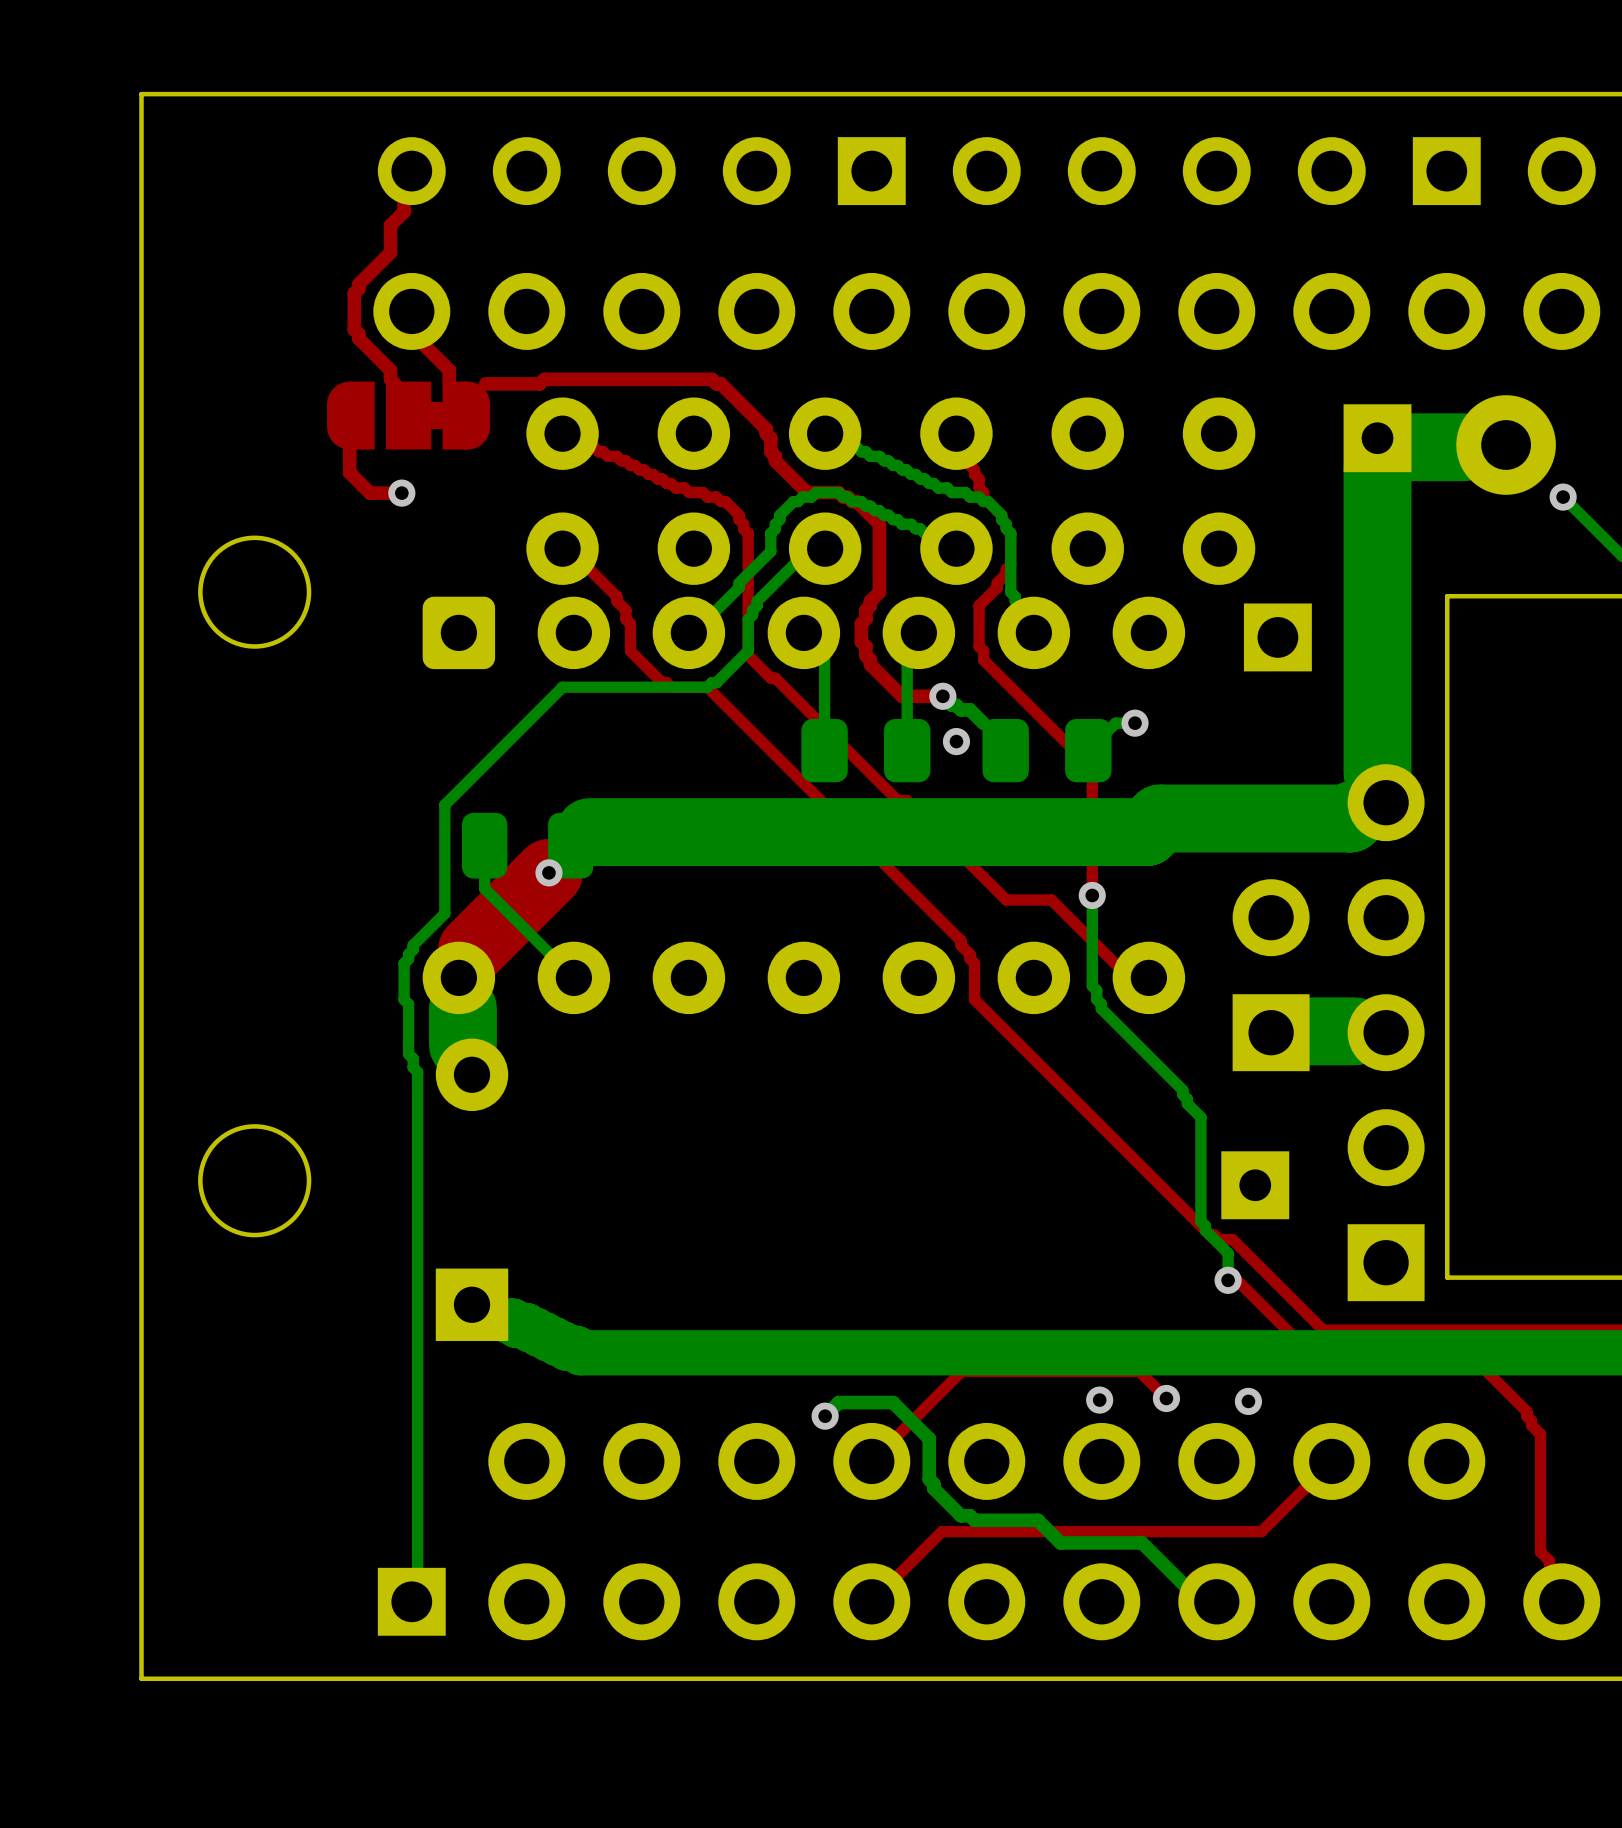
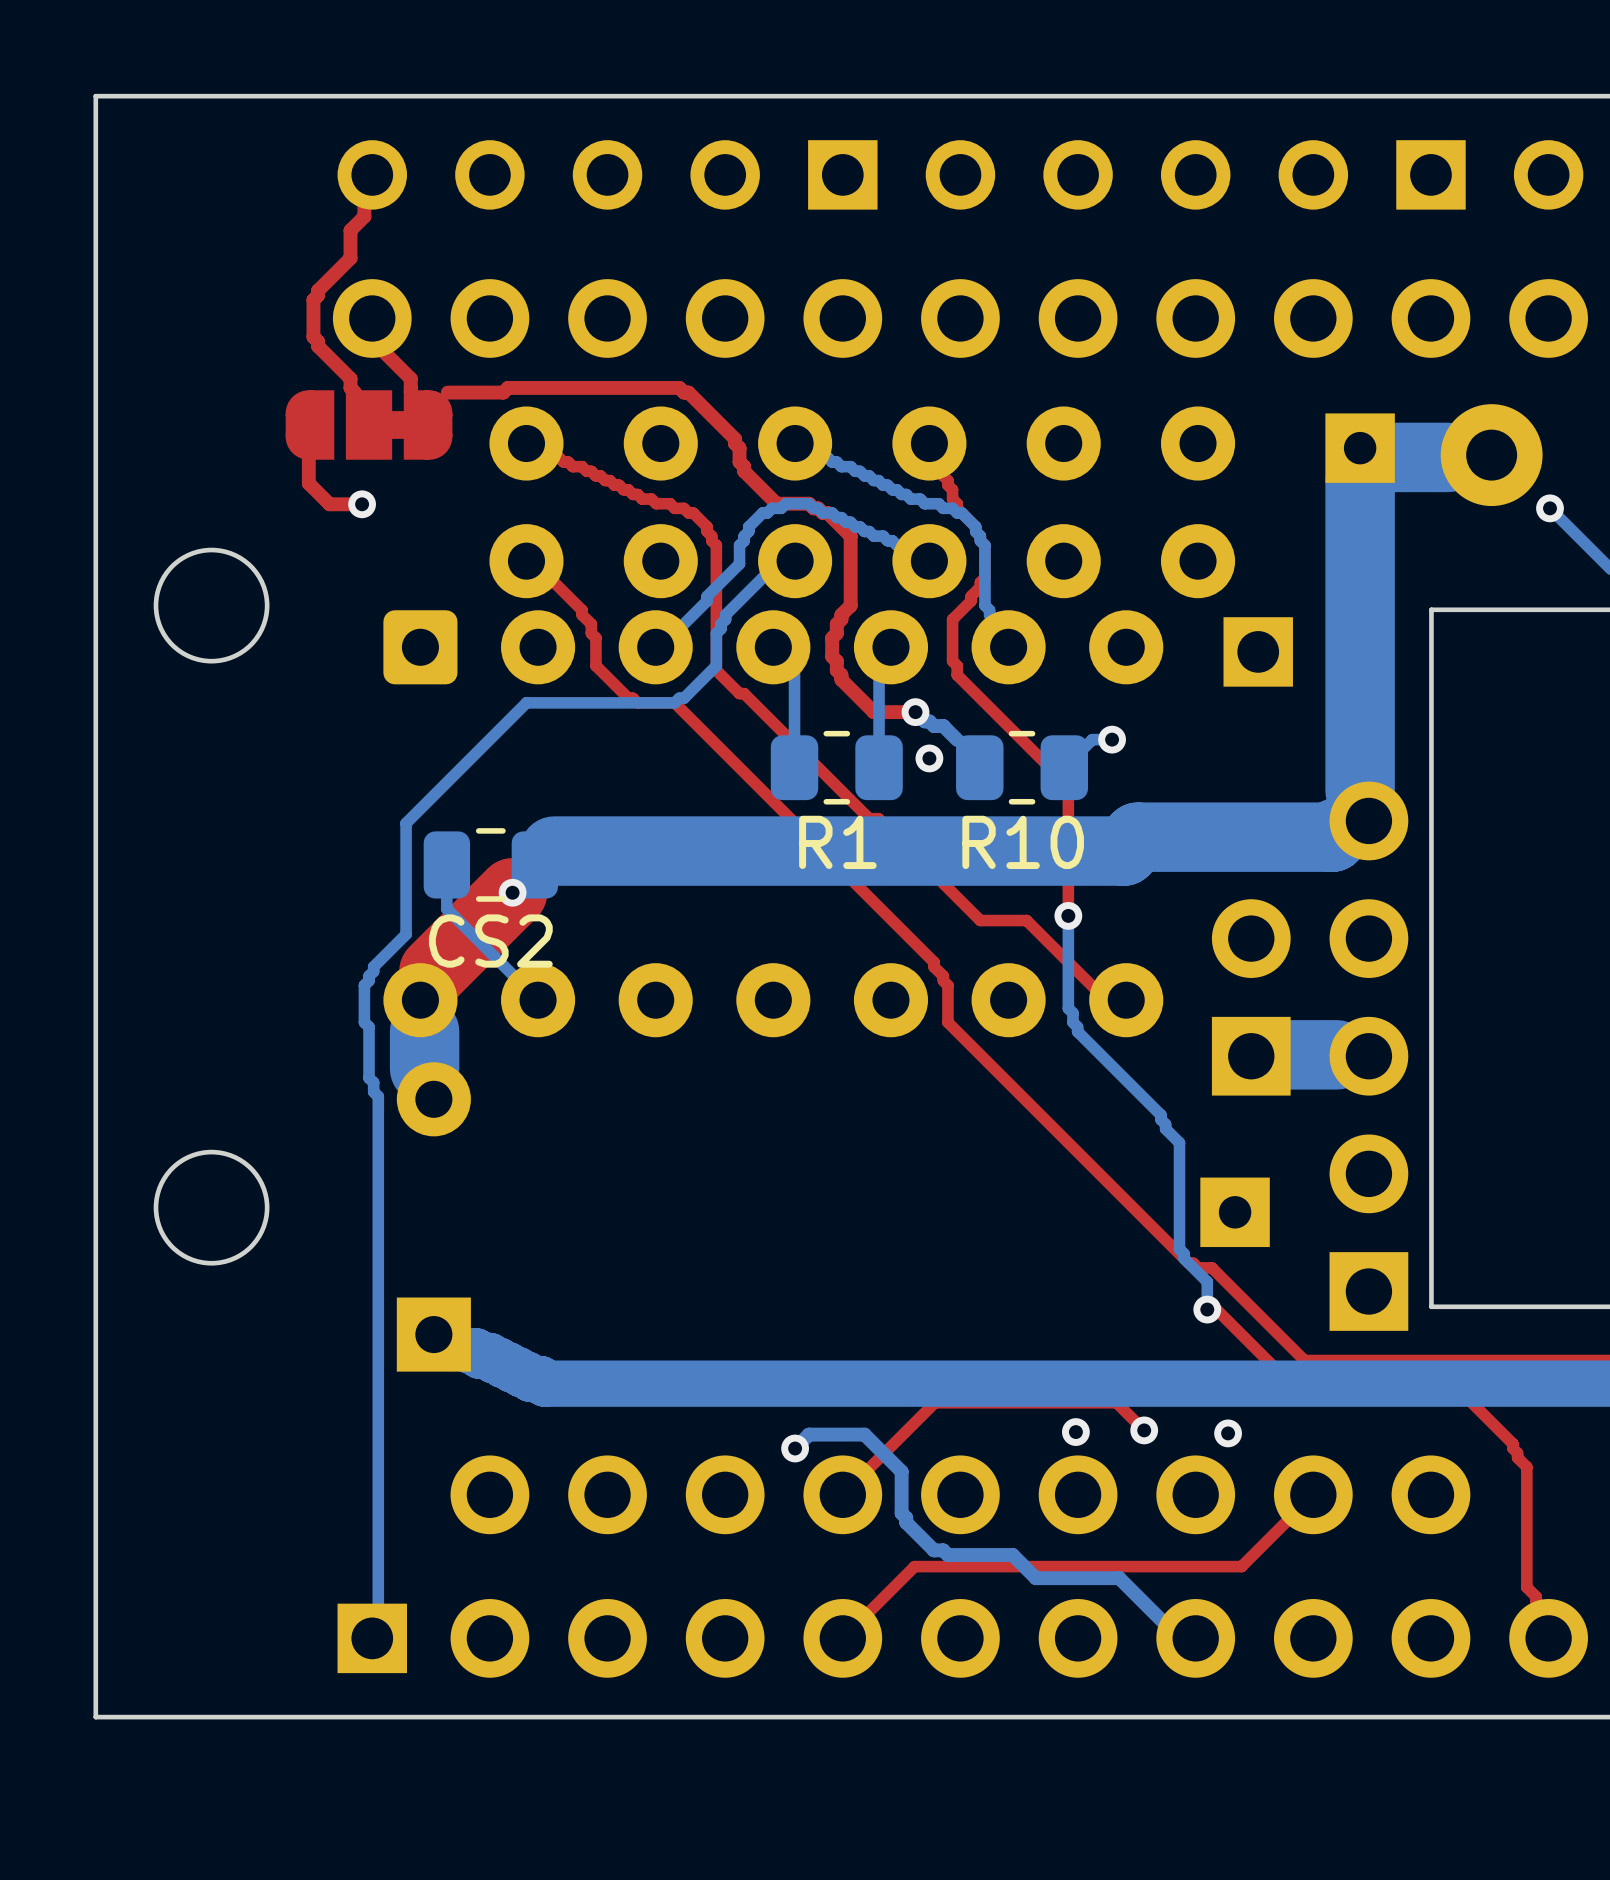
R1: none -> (836, 767)
R10: none -> (1022, 767)
CS2: none -> (490, 864)

